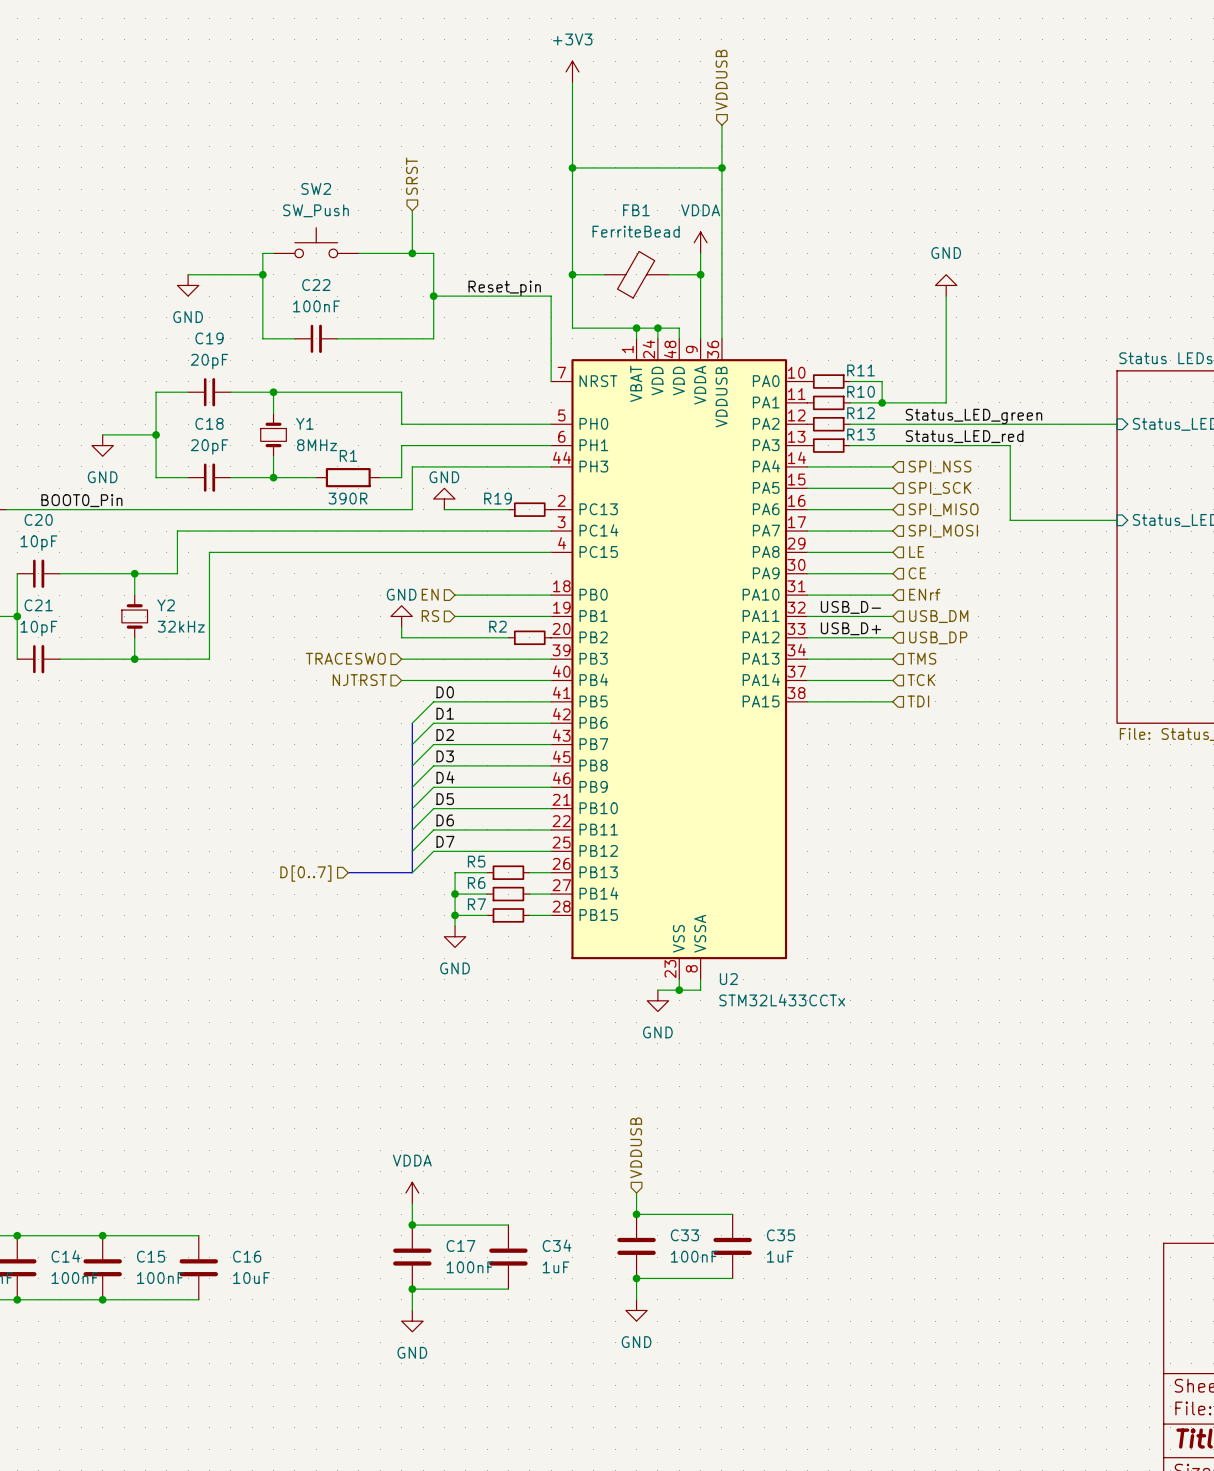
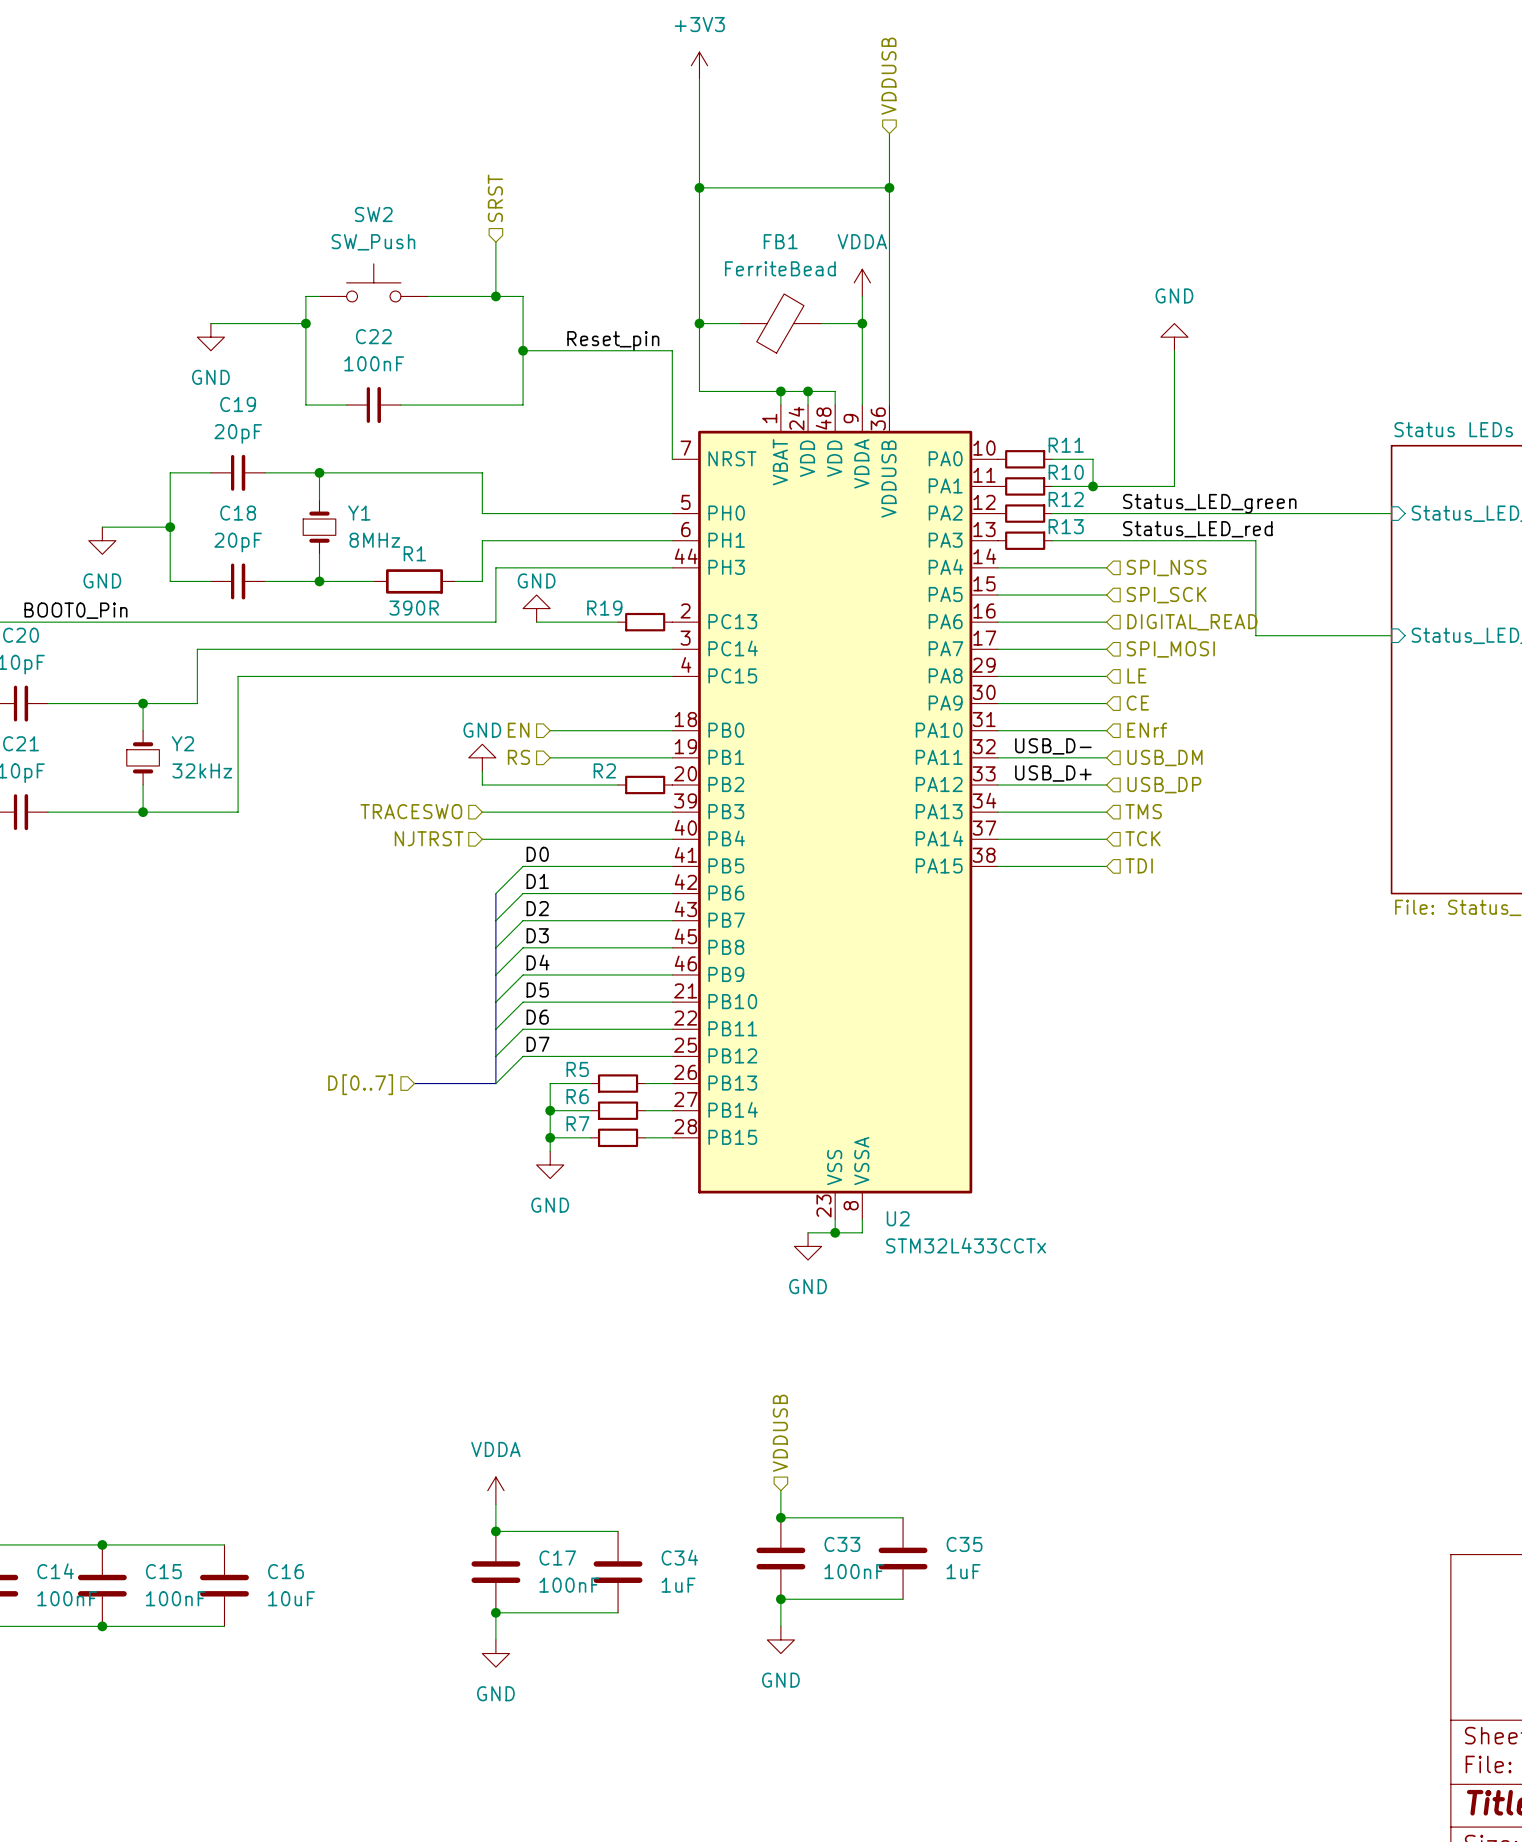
hierarchical label: SPI_MISO (943, 509) -> DIGITAL_READ (1192, 622)

